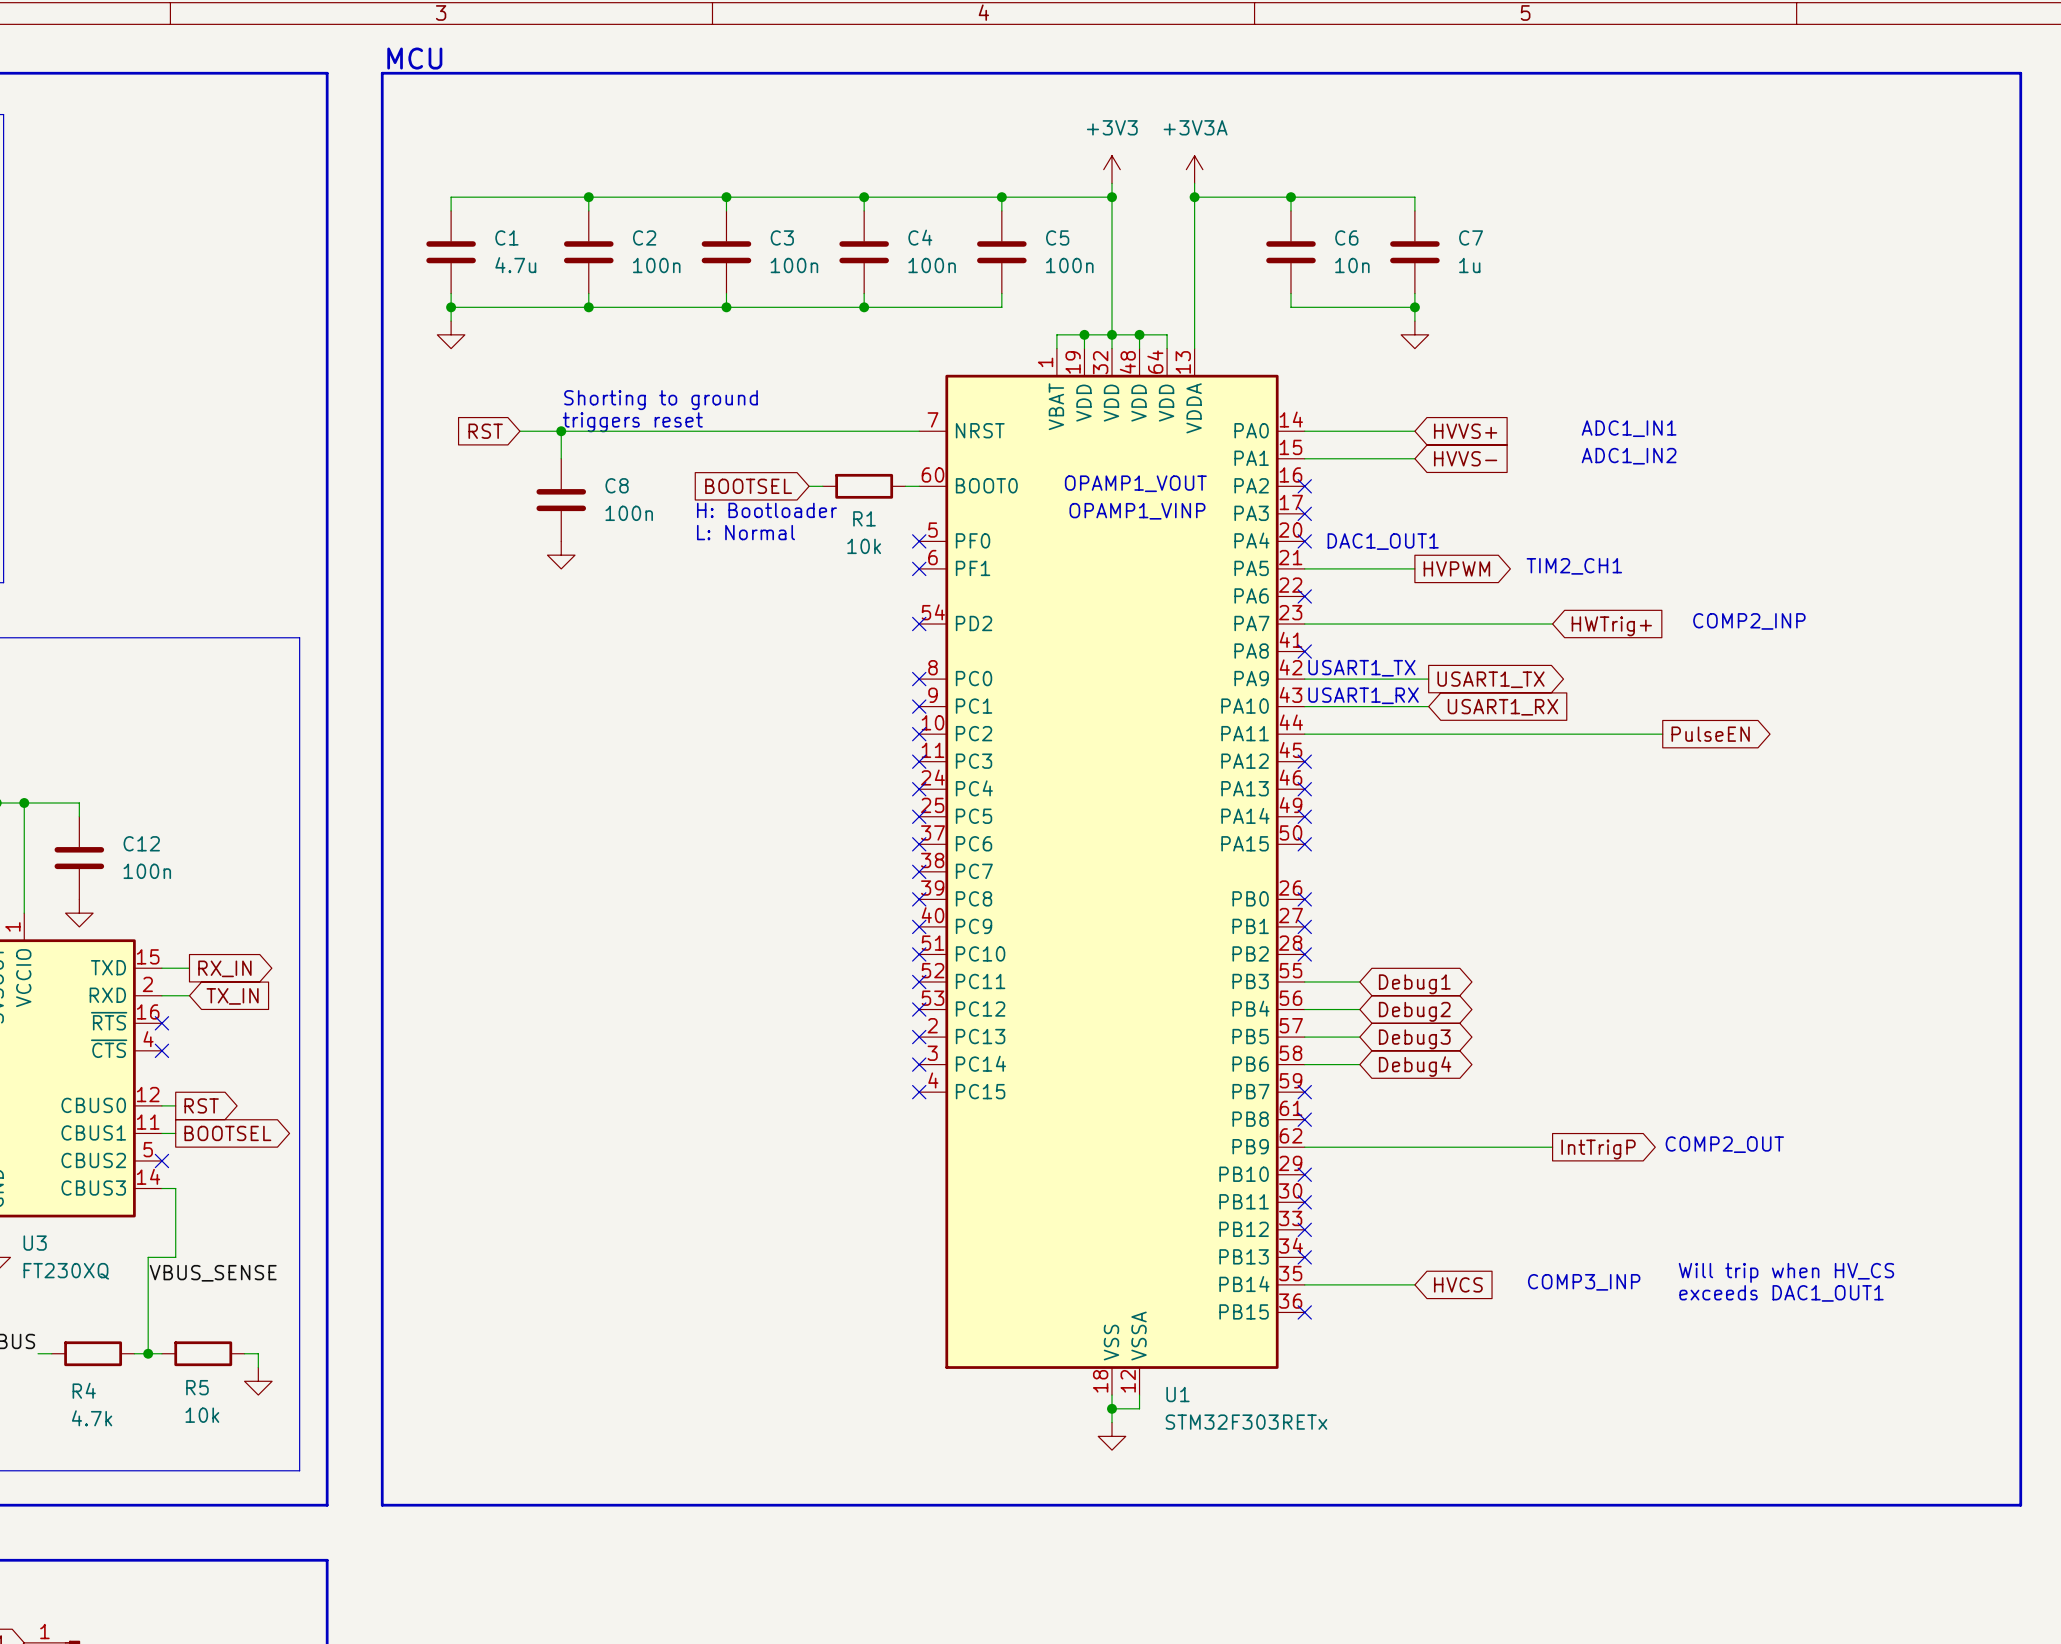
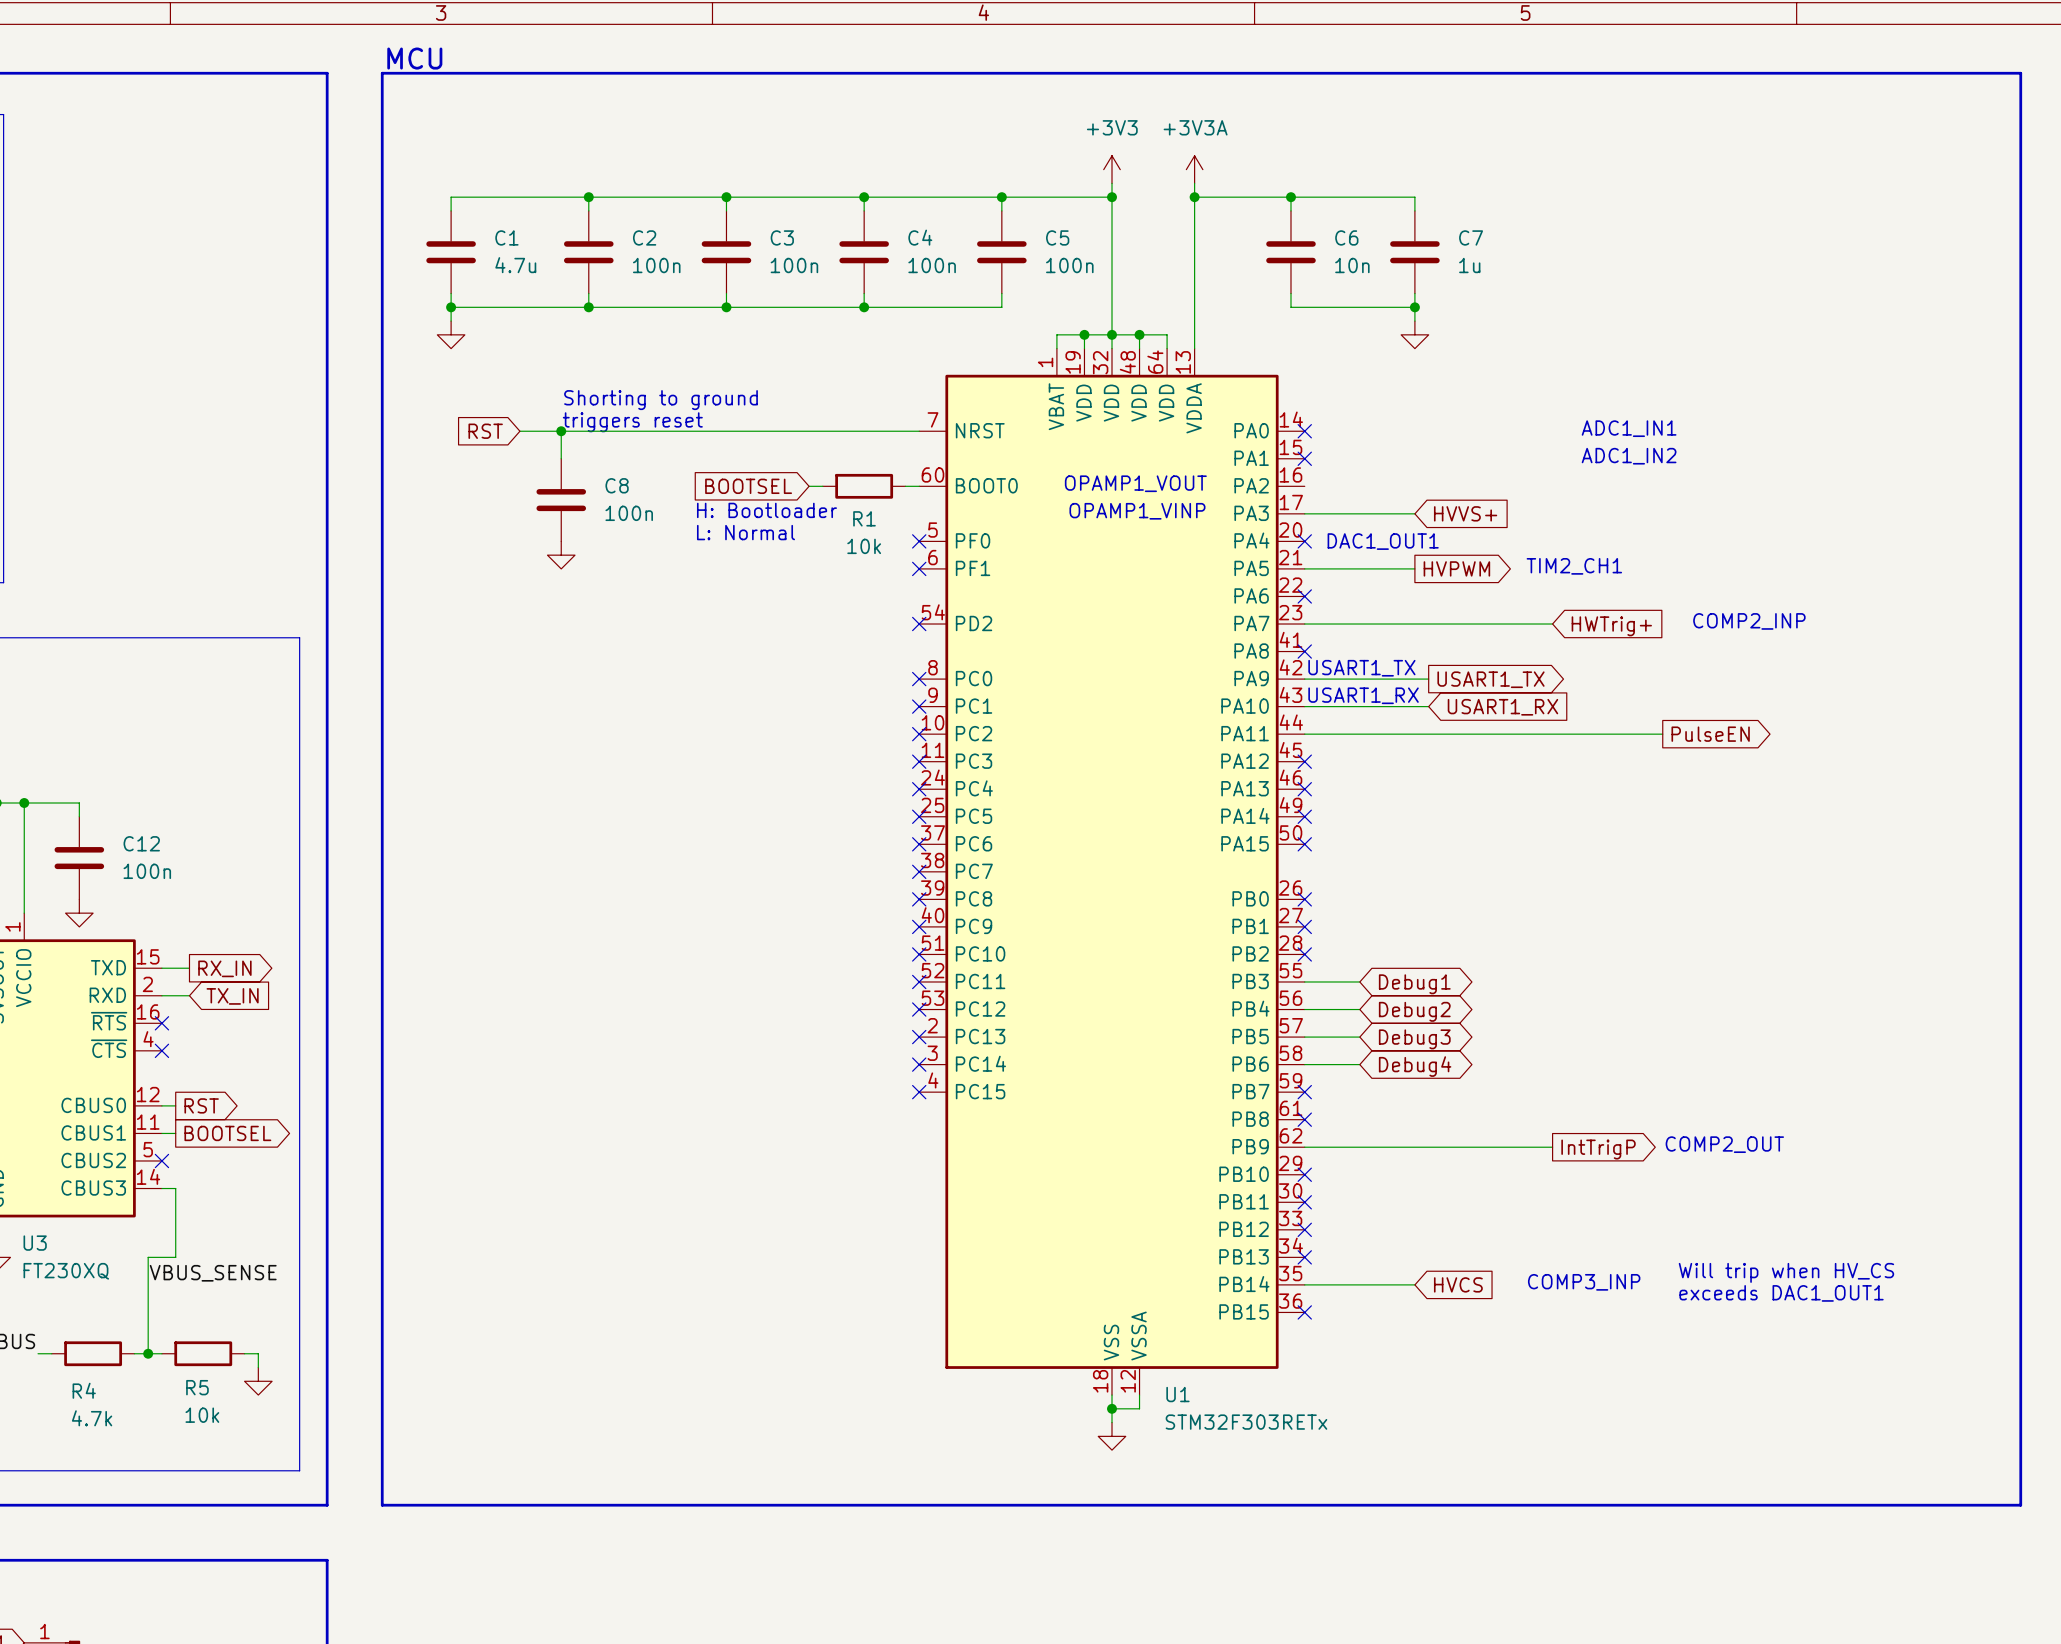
wire: (1304, 431) (1414, 431) -> none
no-connect mark: none -> (1304, 431)
global label position: HVVS+ (1465, 431) -> HVVS+ (1465, 513)
wire: (1304, 458) (1414, 458) -> (1304, 513) (1414, 513)
no-connect mark: none -> (1304, 458)
global label: HVVS- (1465, 458) -> none
no-connect mark: (1304, 486) -> none
no-connect mark: (1304, 513) -> none

